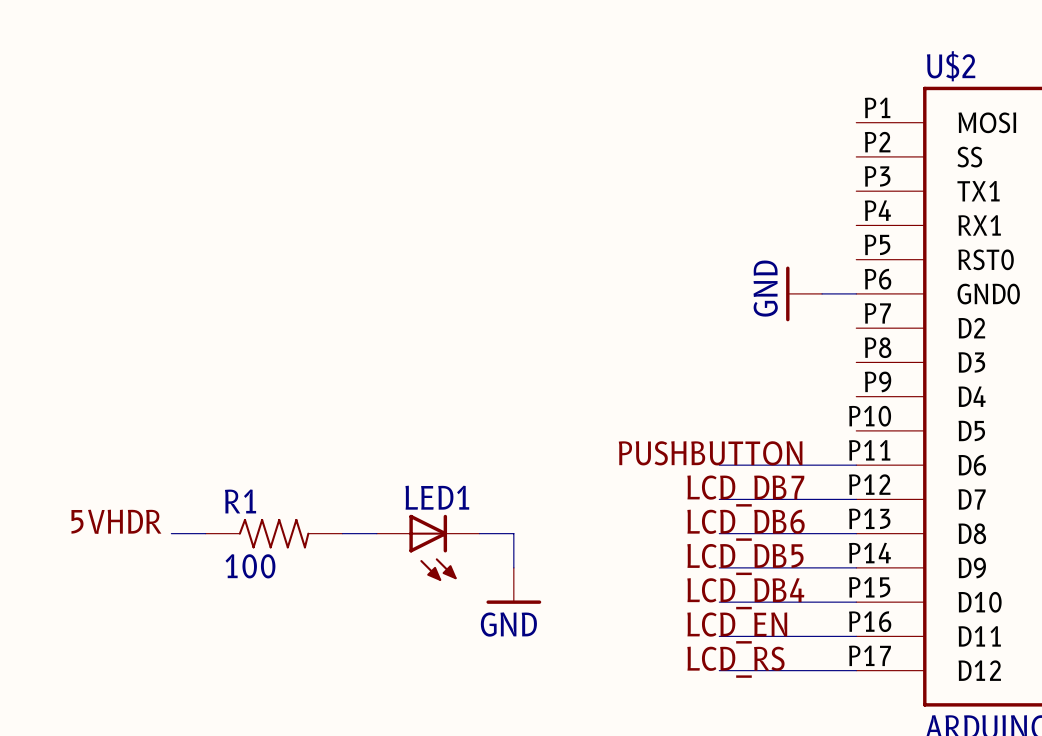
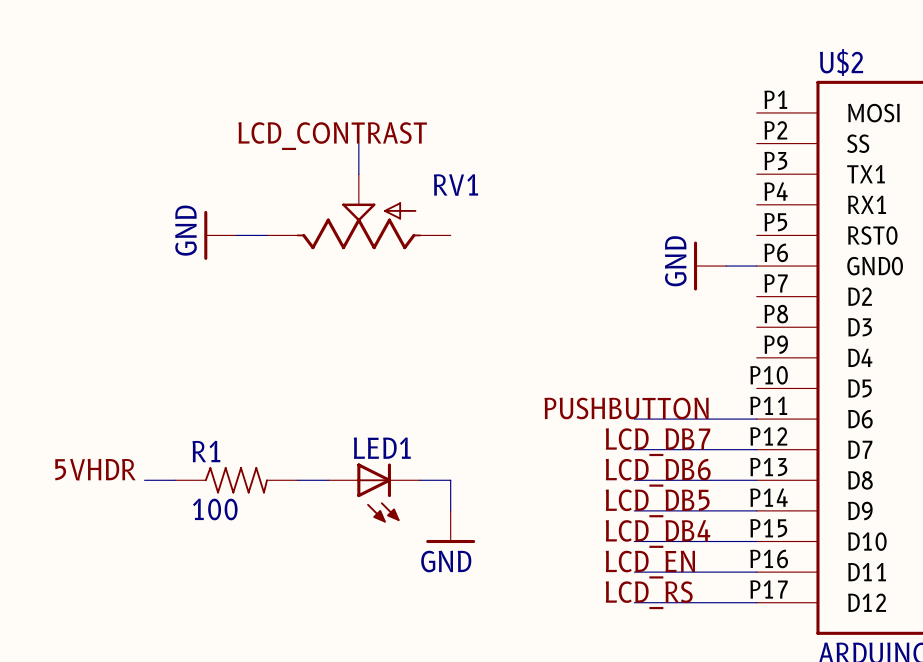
label: none -> LCD_CONTRAST (332, 136)
wire: none -> (358, 143) (358, 174)
RV1: none -> (358, 211)
power symbol: none -> GND (220, 235)
wire: none -> (236, 235) (267, 235)

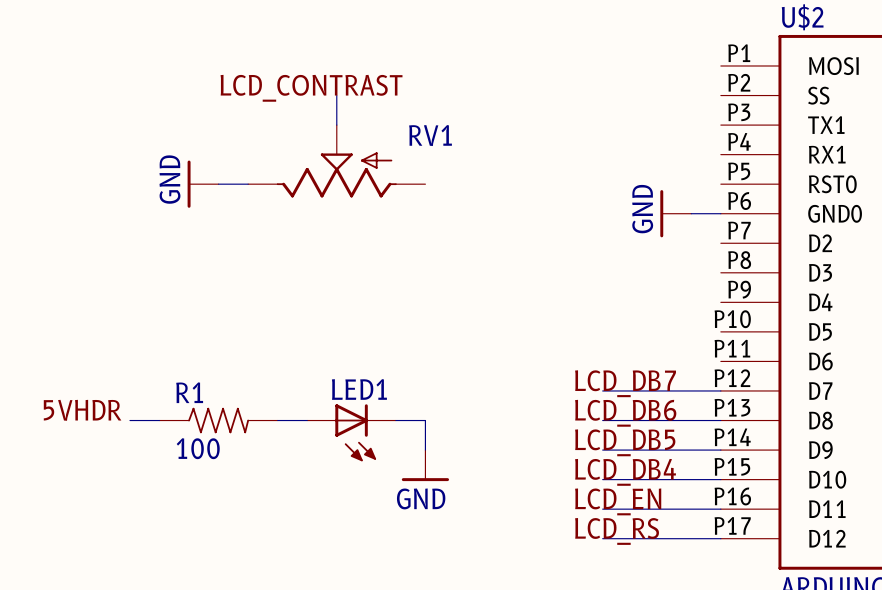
label: PUSHBUTTON (626, 408) -> none
wire: (634, 419) (756, 419) -> none

